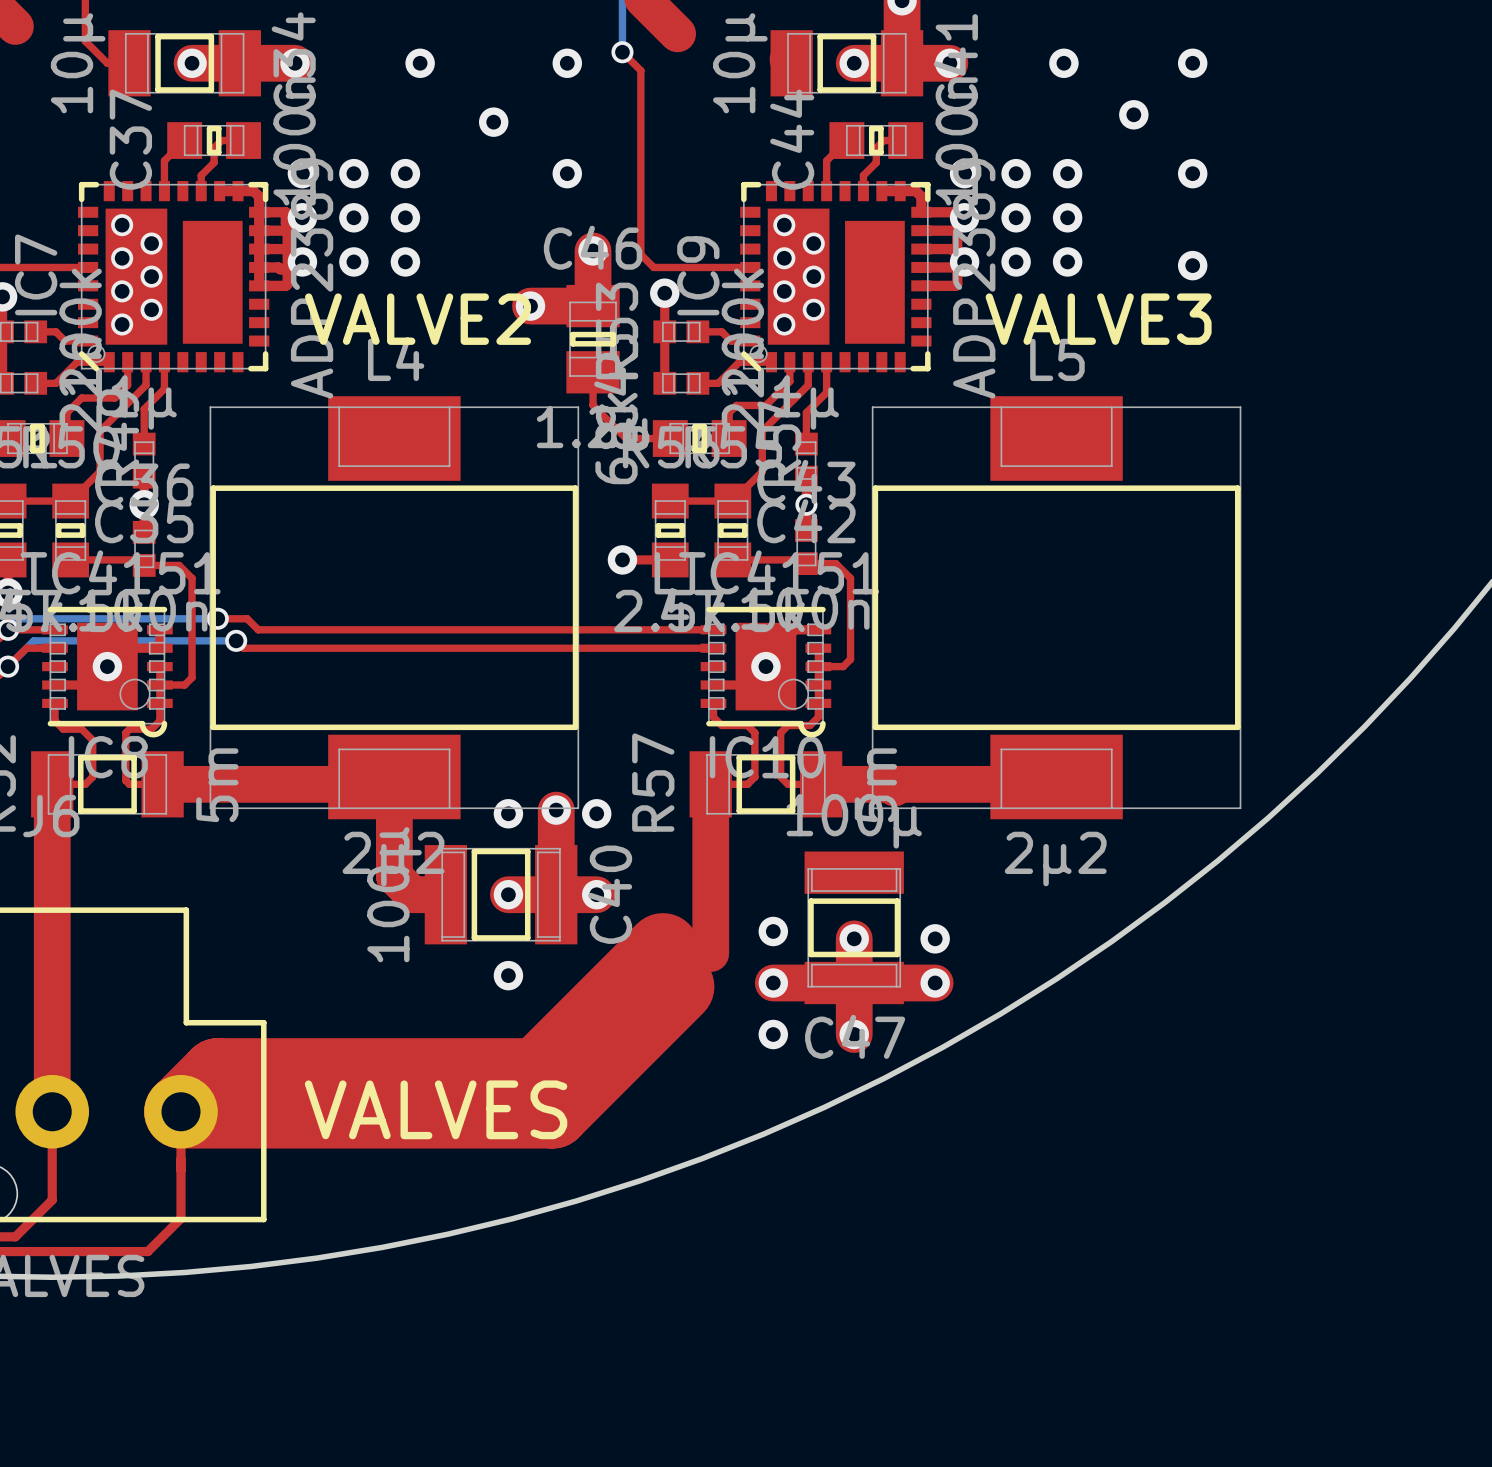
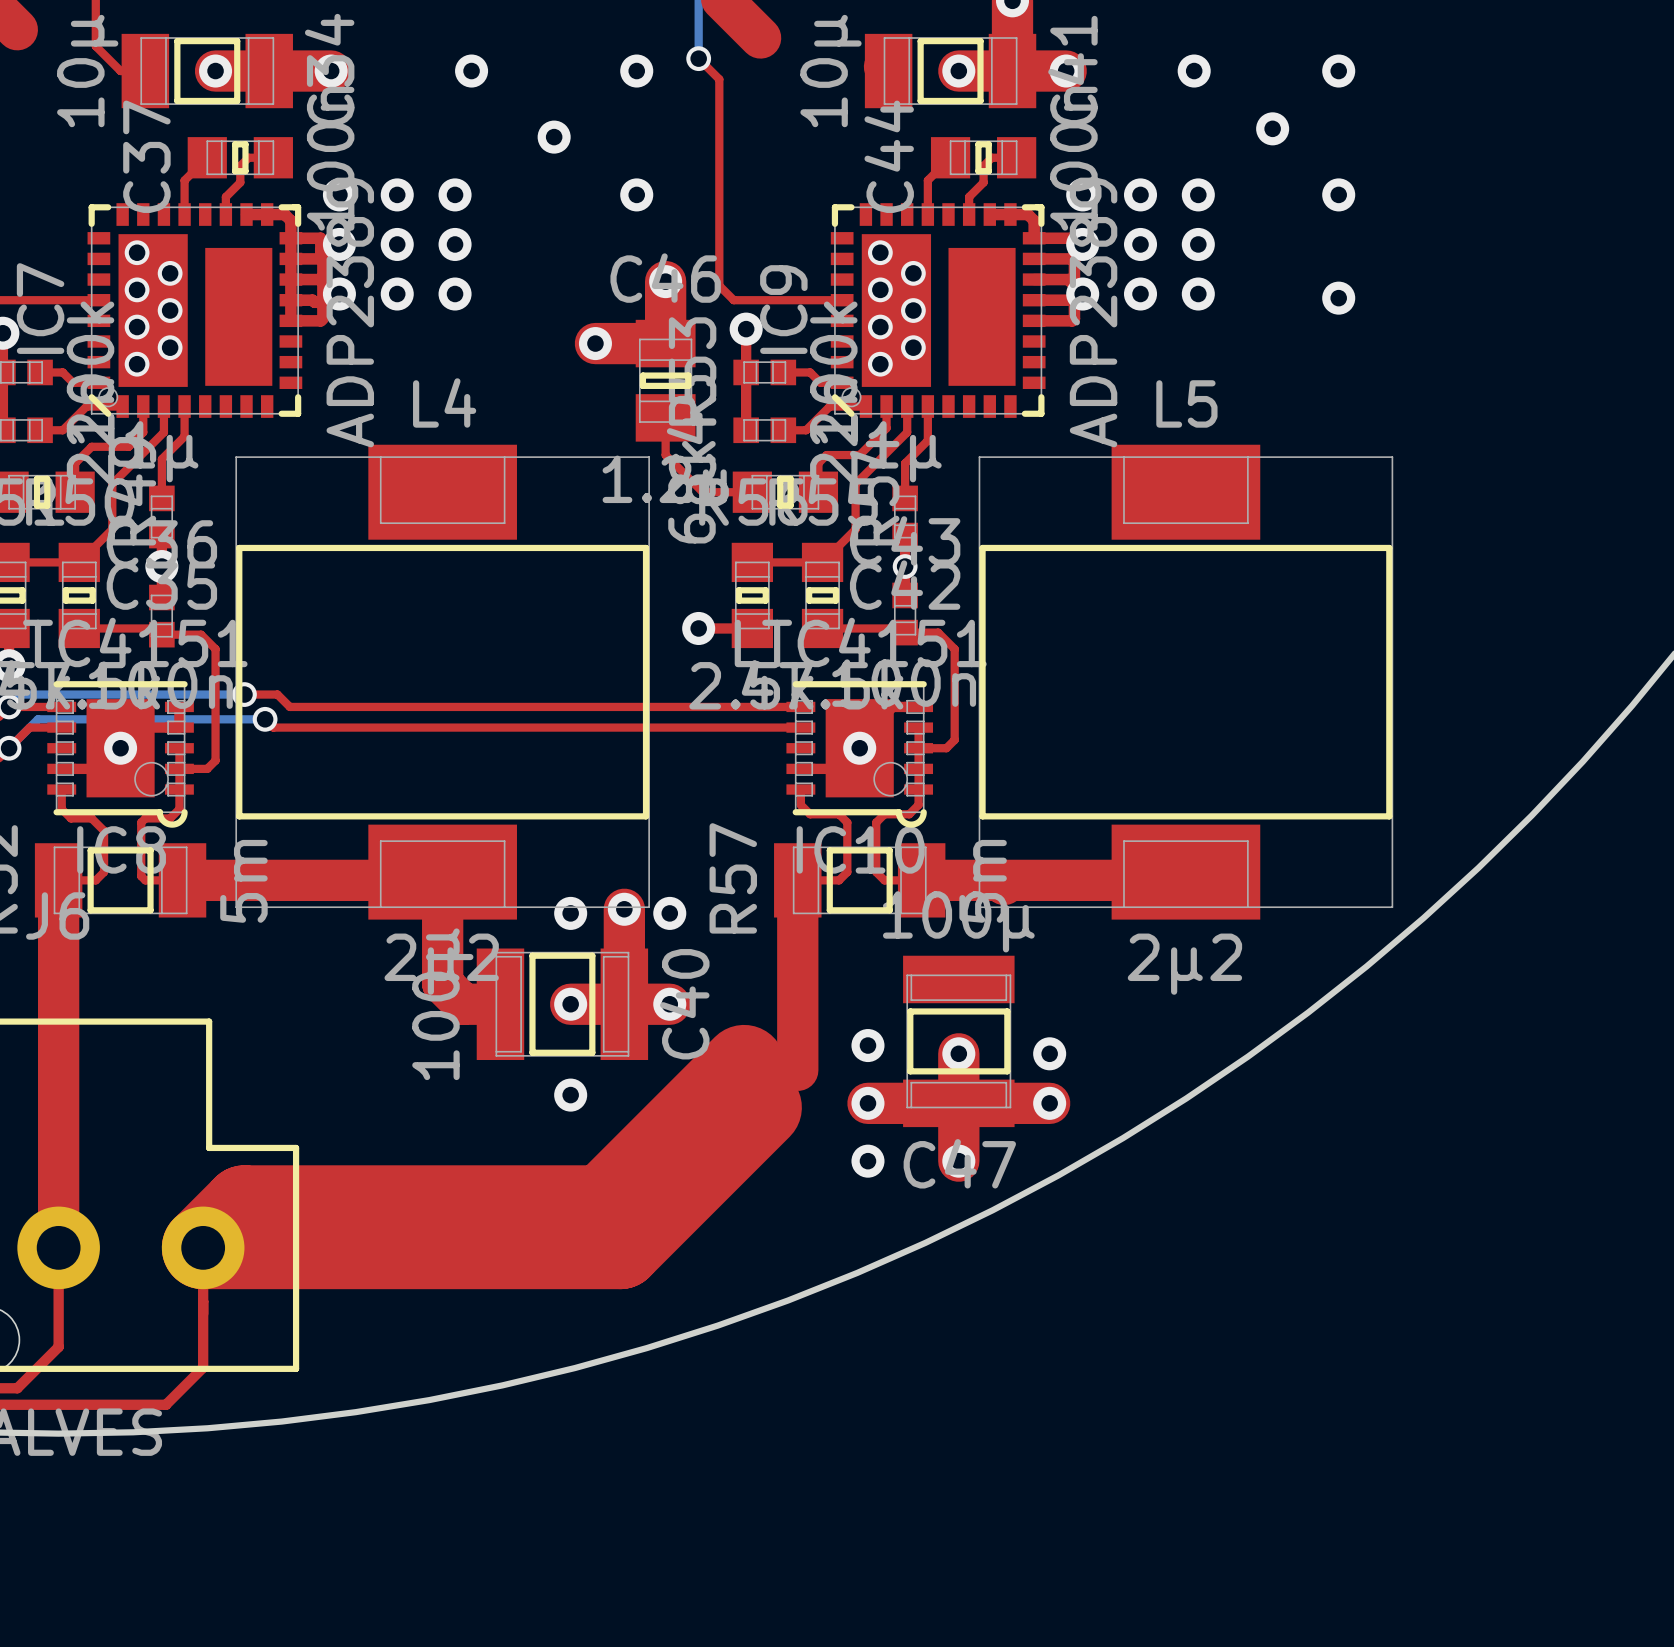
text: VALVE2 (418, 319) -> none
text: VALVE3 (1098, 319) -> none
text: VALVES (436, 1109) -> none

